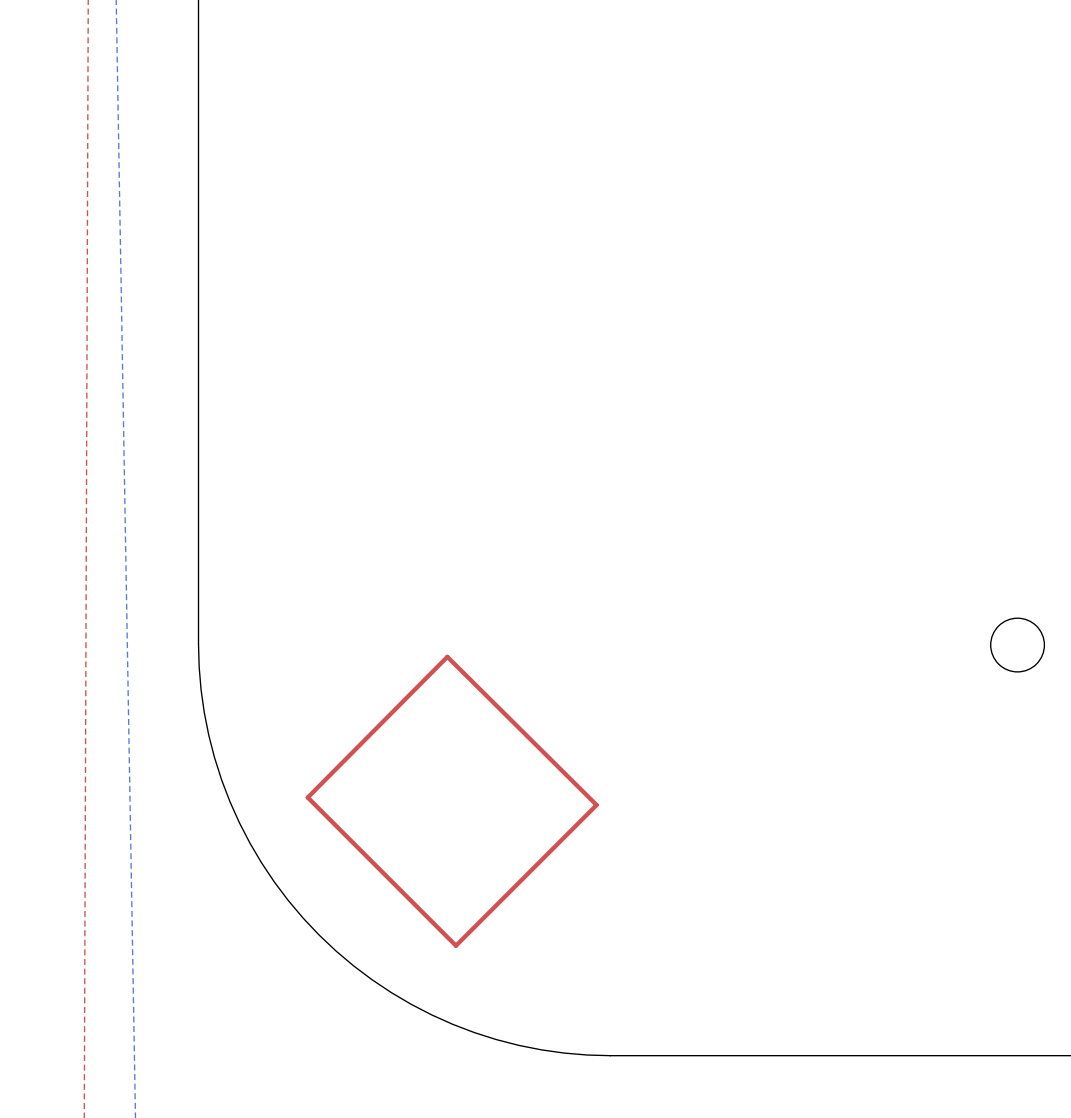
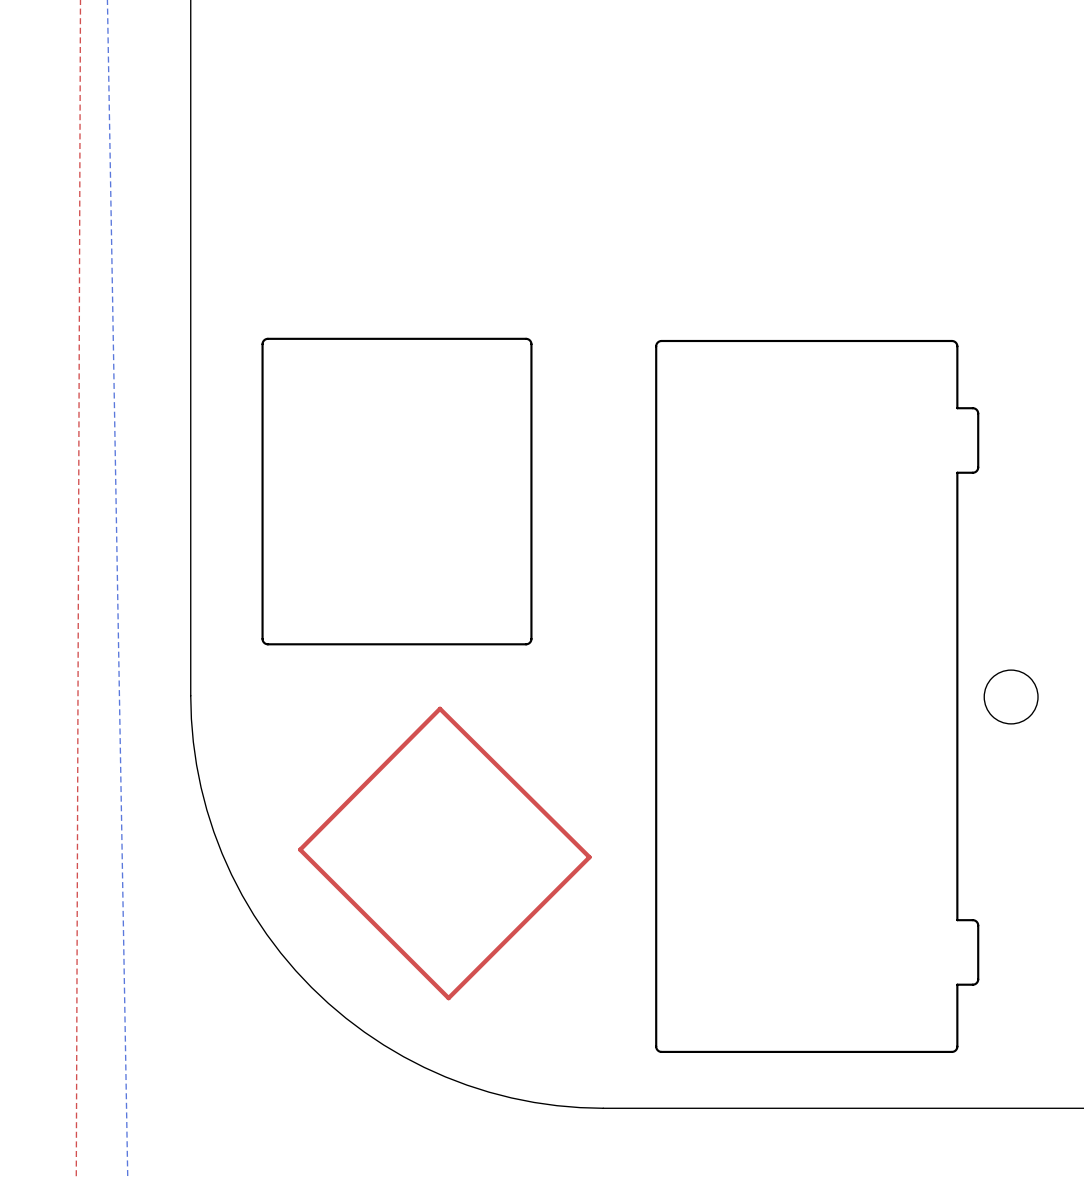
drawing: none -> [261, 337, 533, 646]
drawing: none -> [655, 339, 980, 1054]

